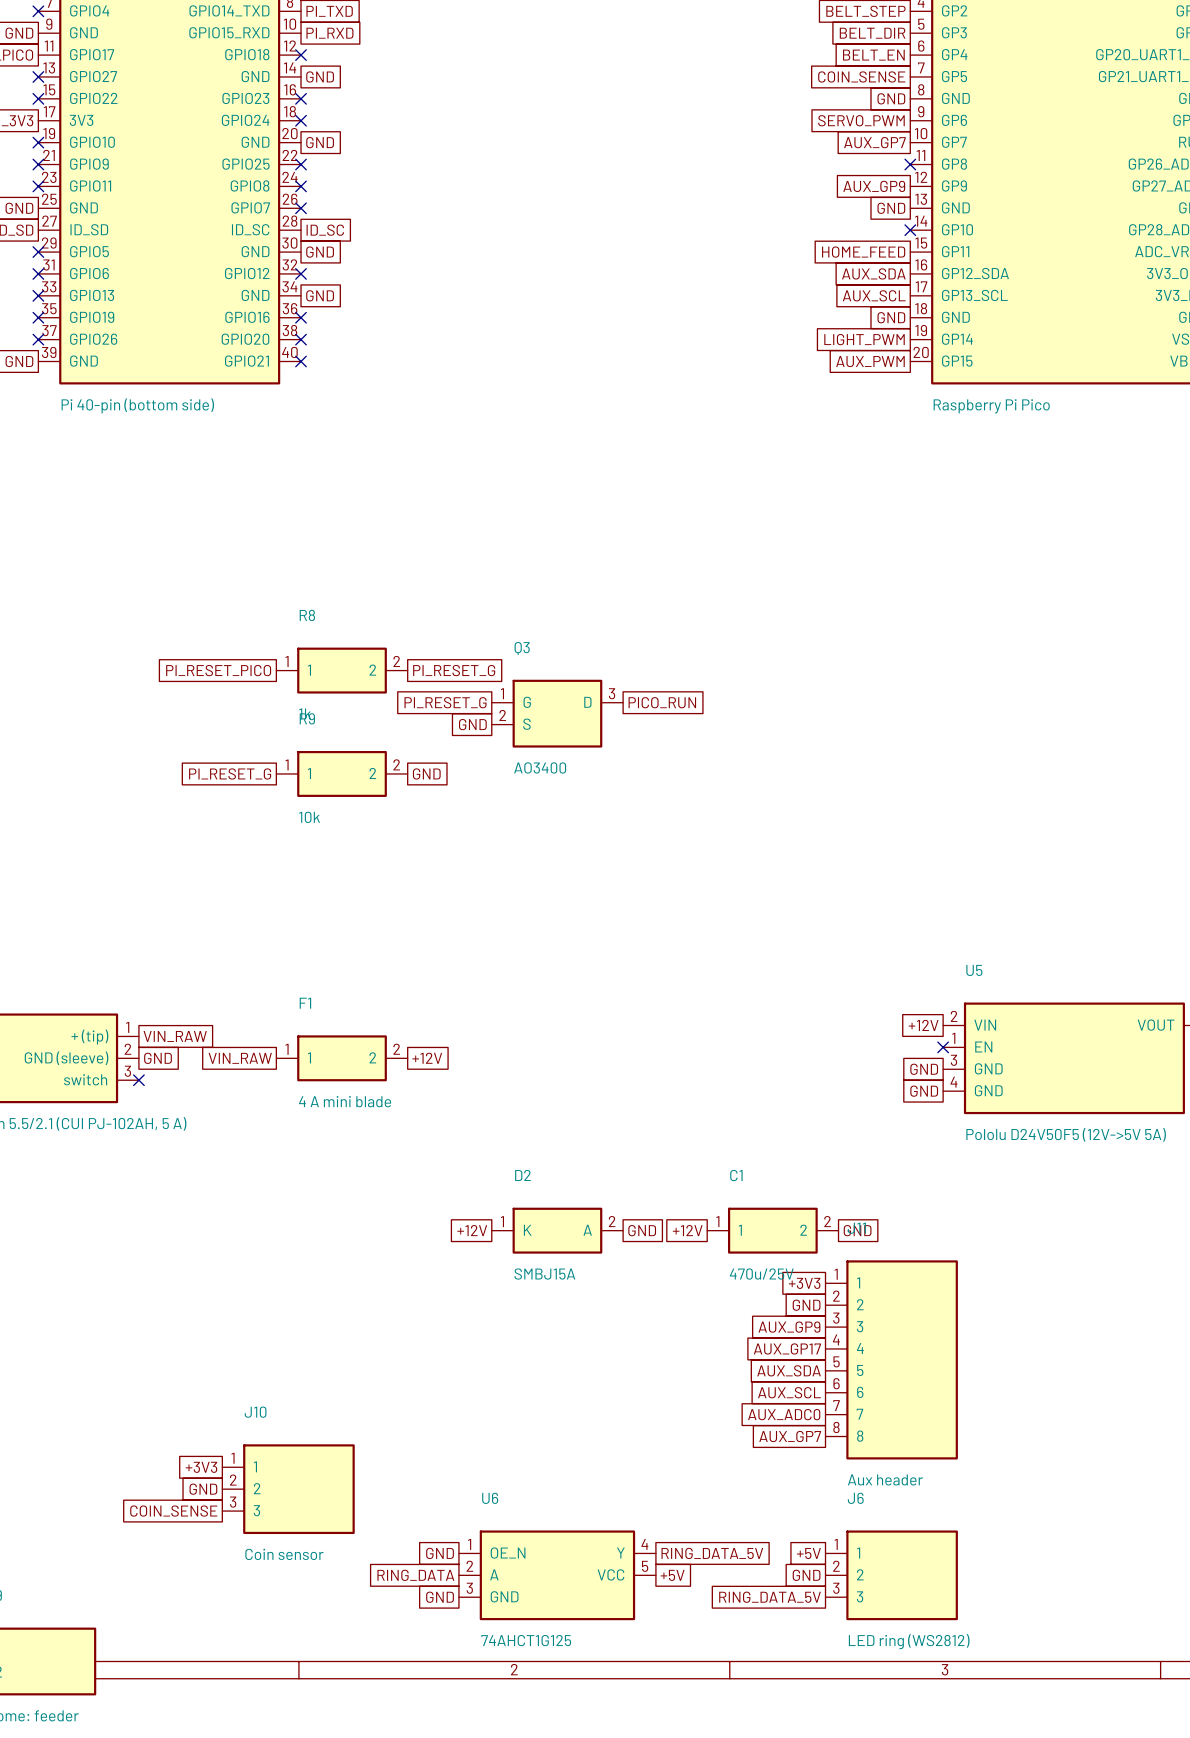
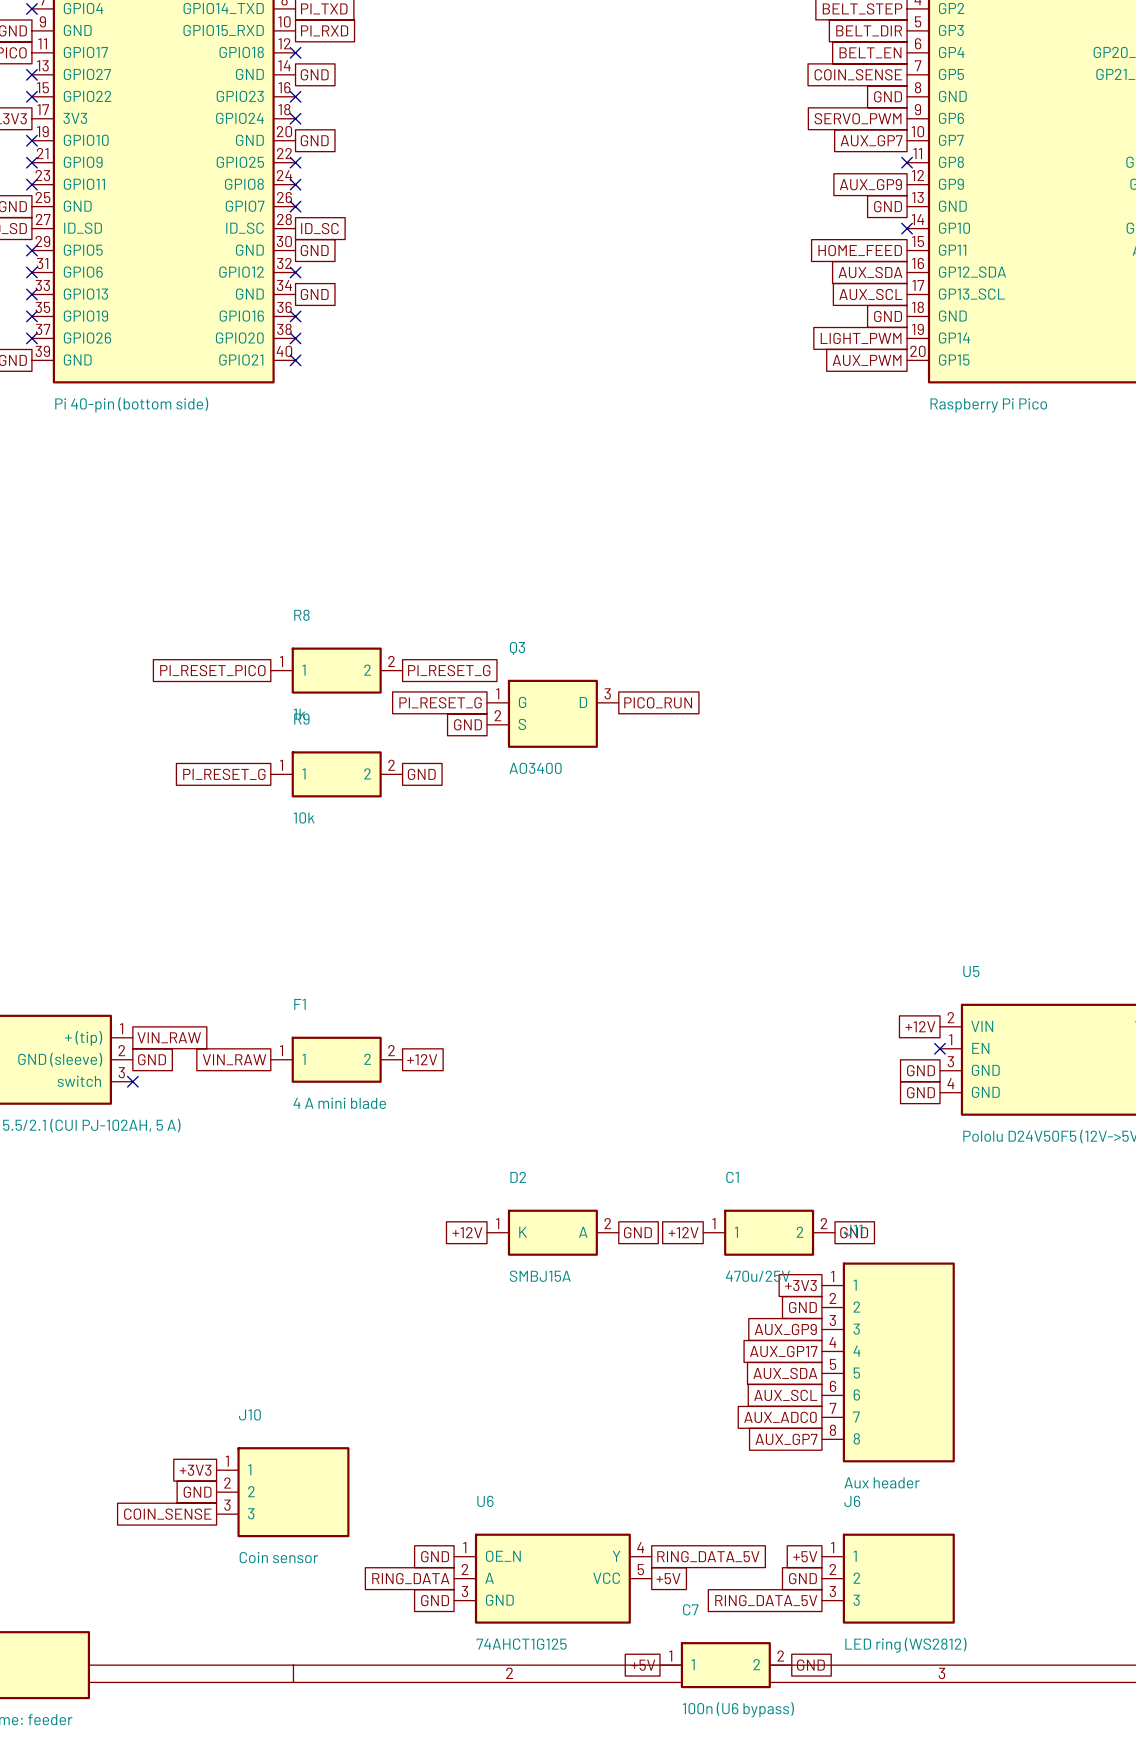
global label: none -> +5V (643, 1665)
C7: none -> 100n (U6 bypass) (725, 1665)
global label: none -> GND (810, 1665)

